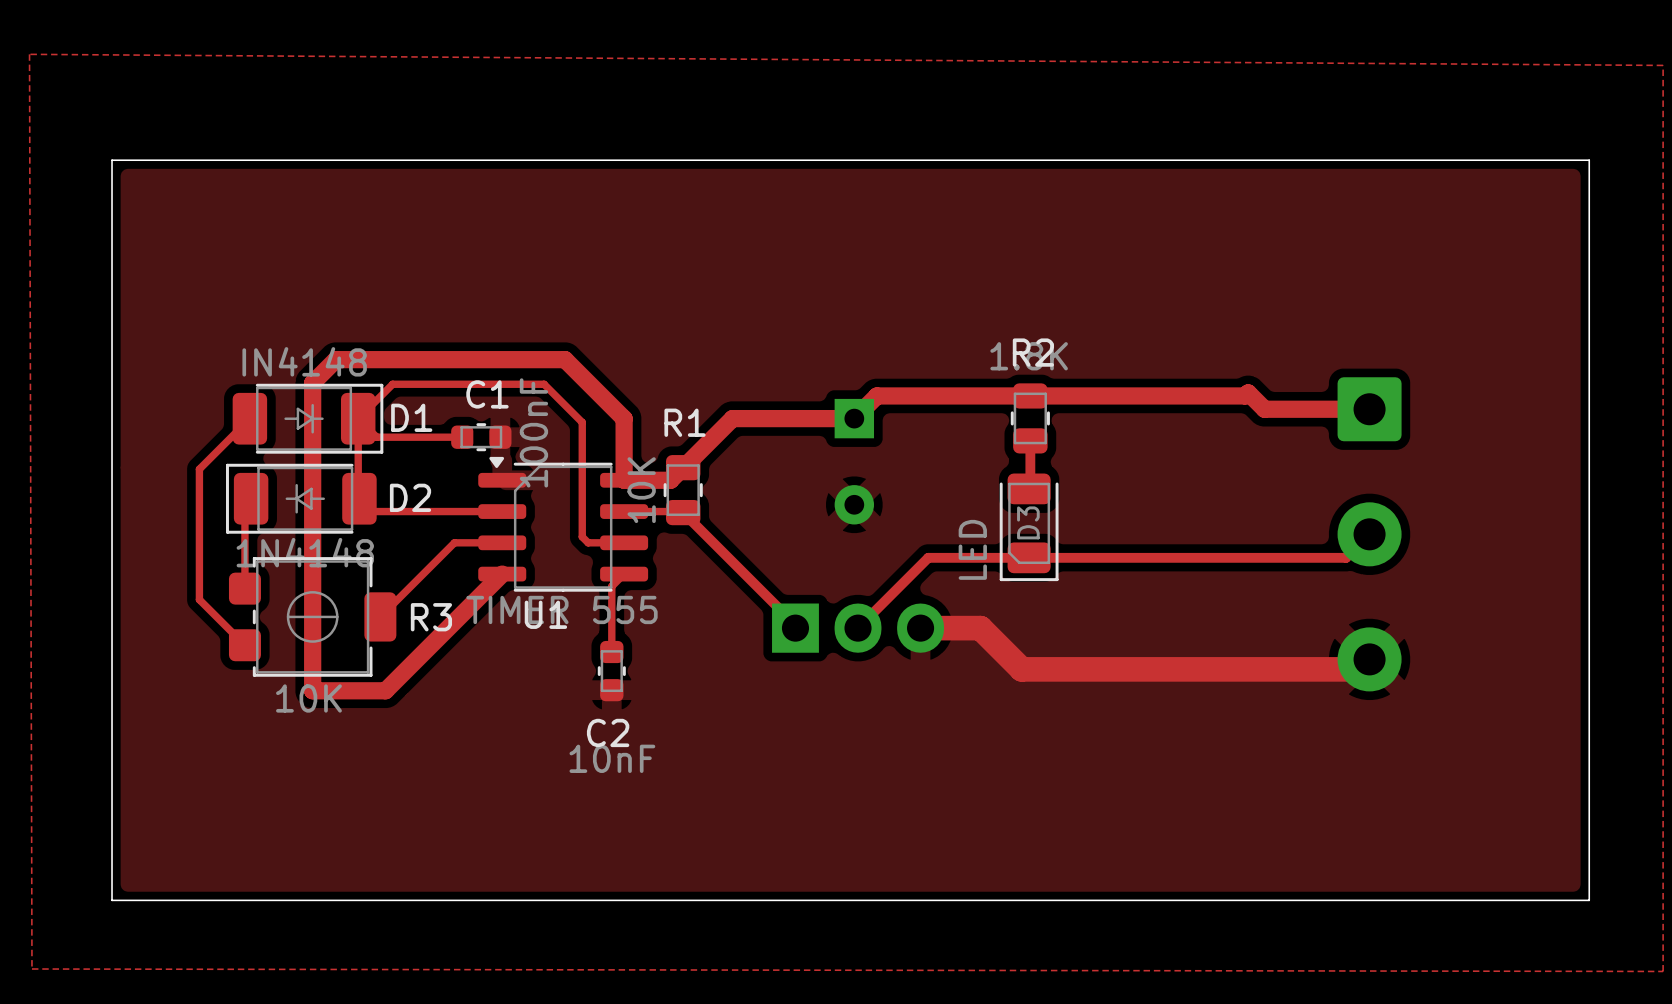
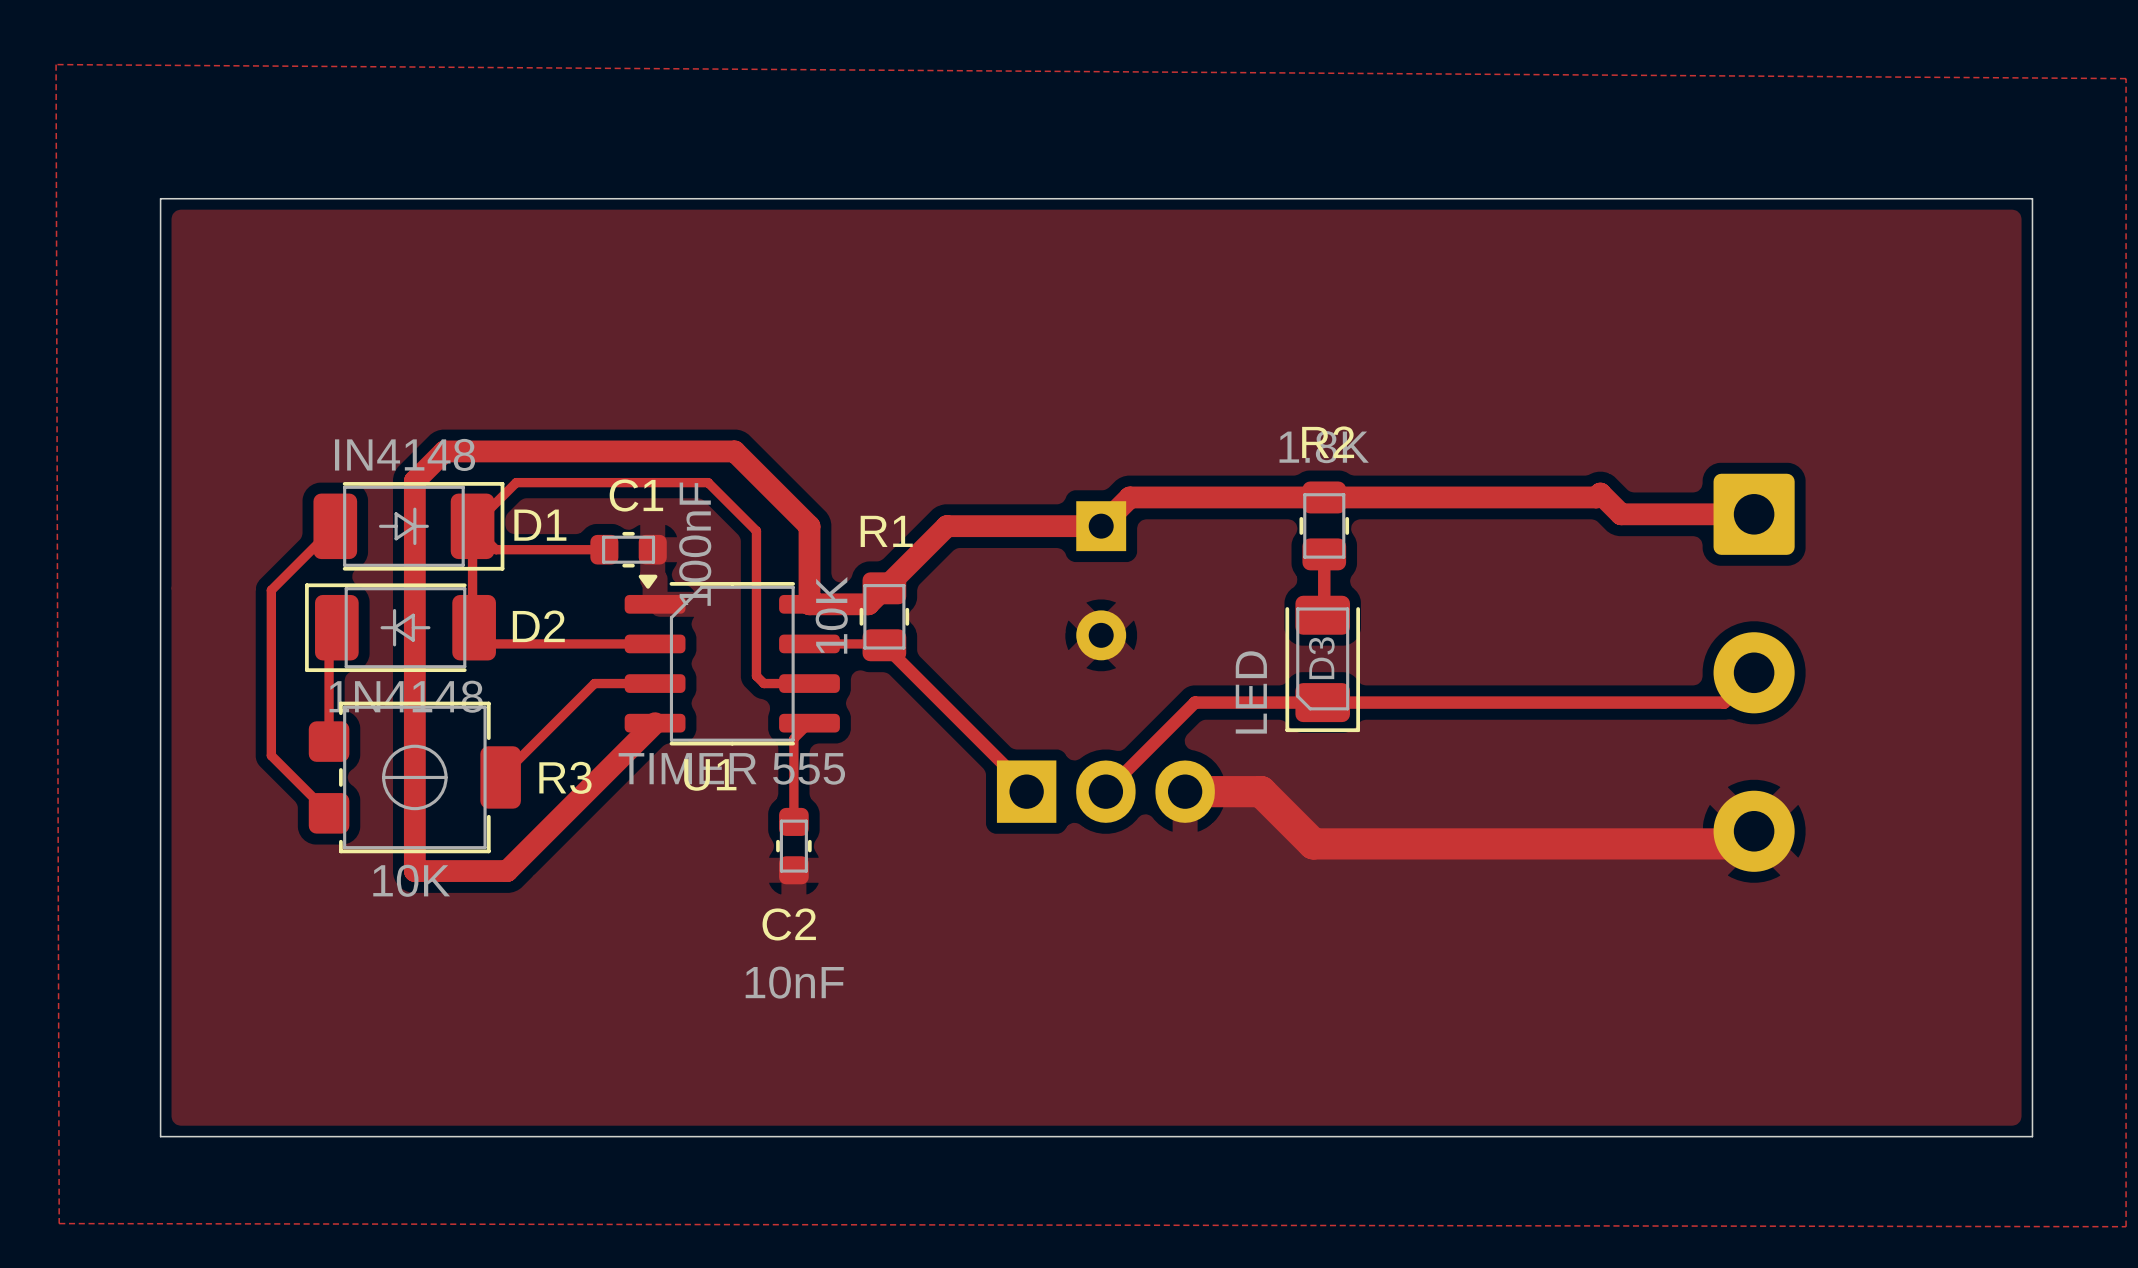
C2 value position: 10nF (612, 758) -> 10nF (794, 982)

